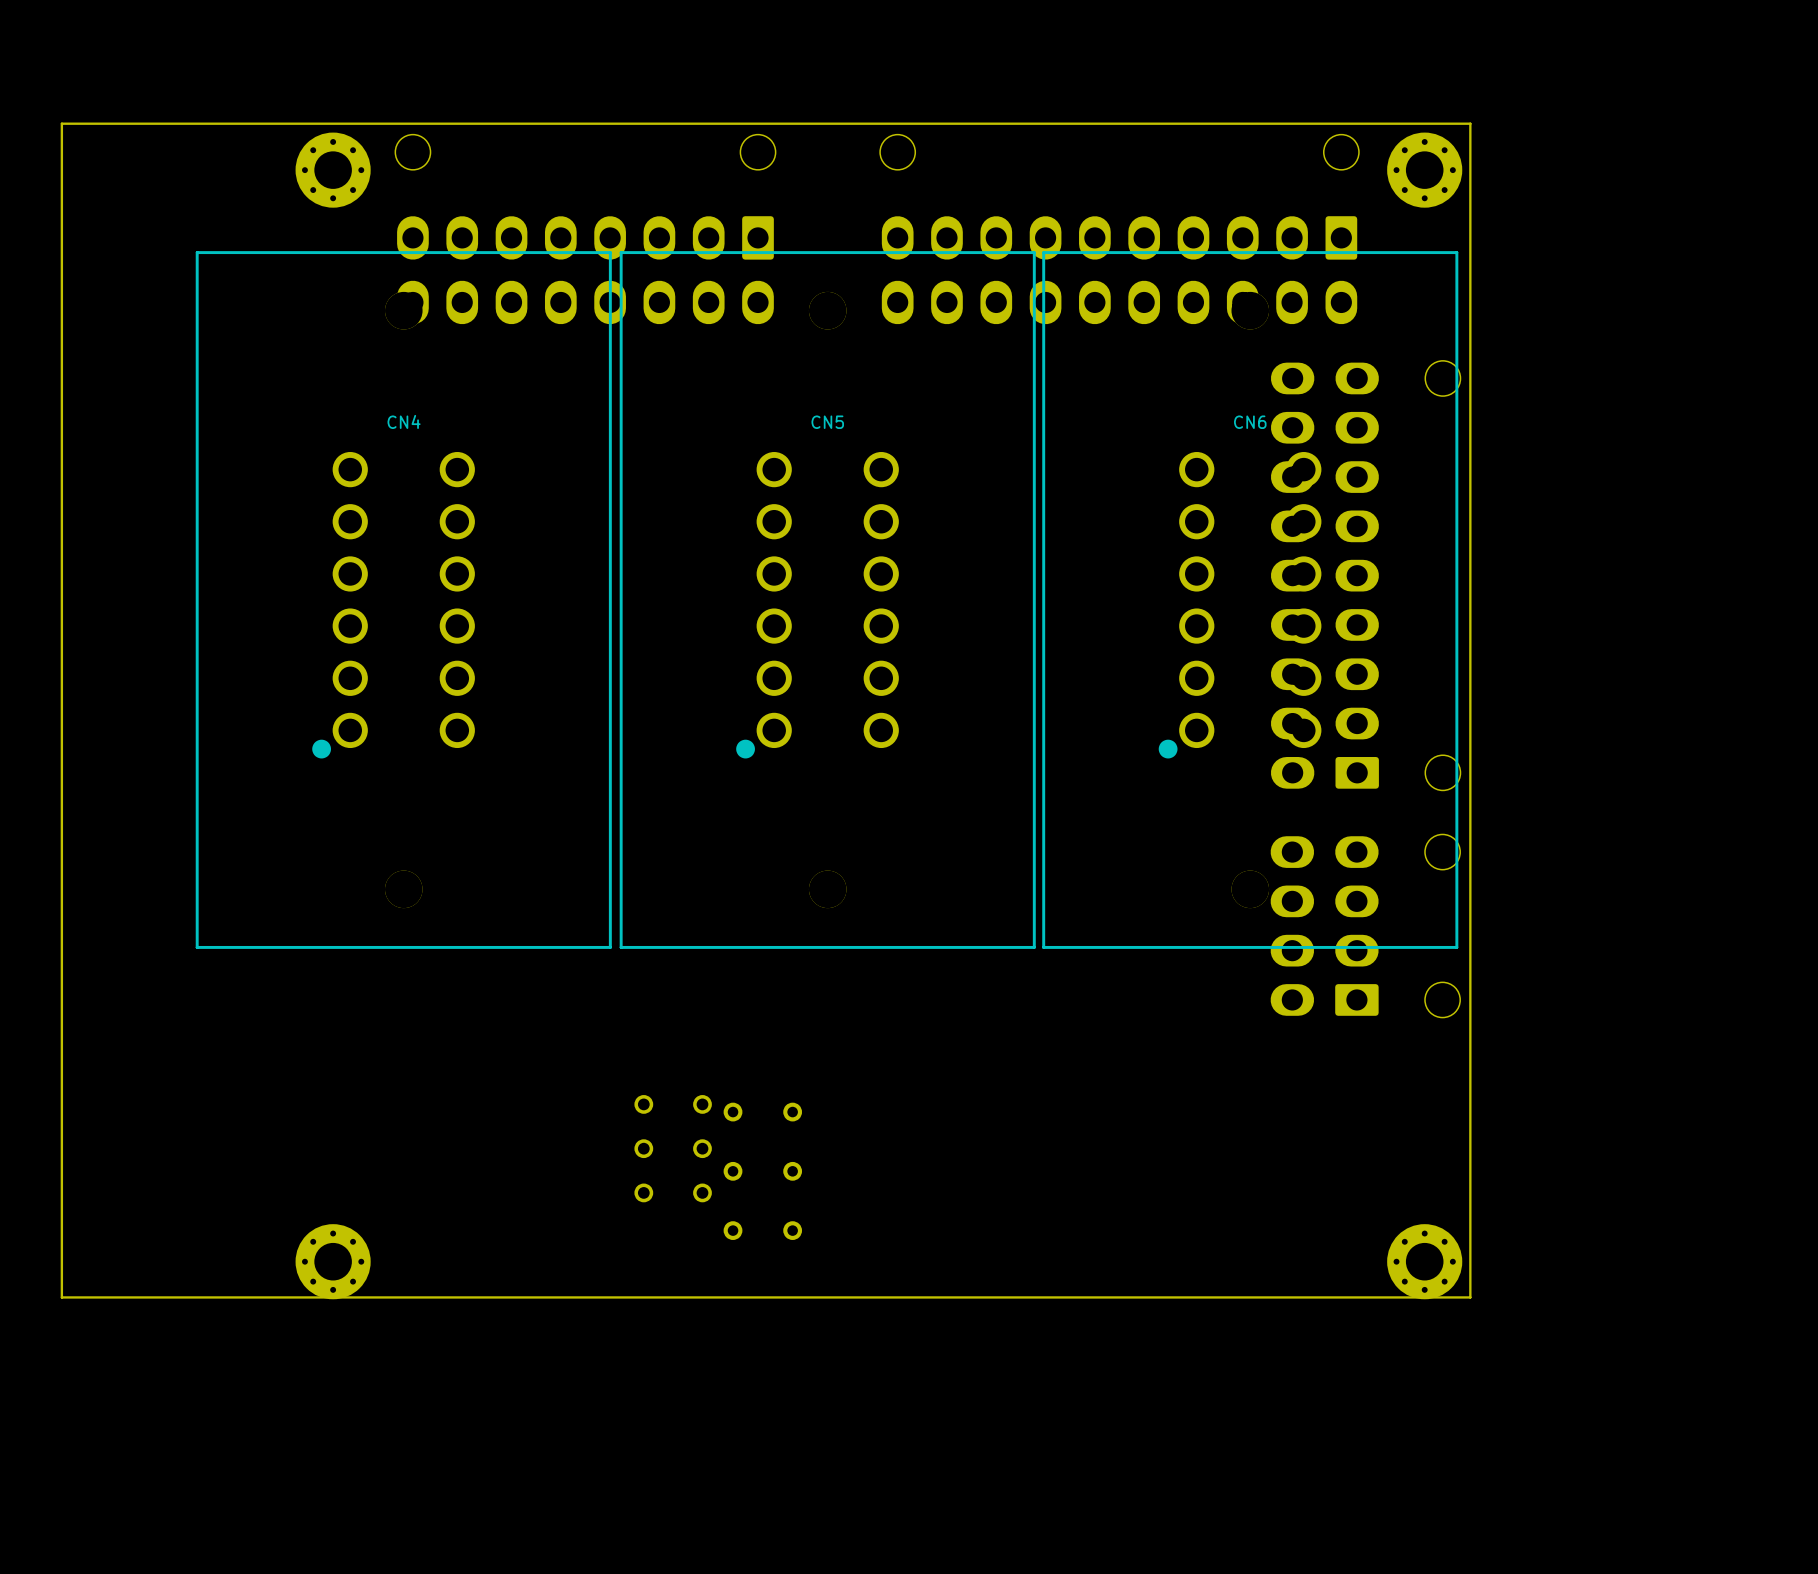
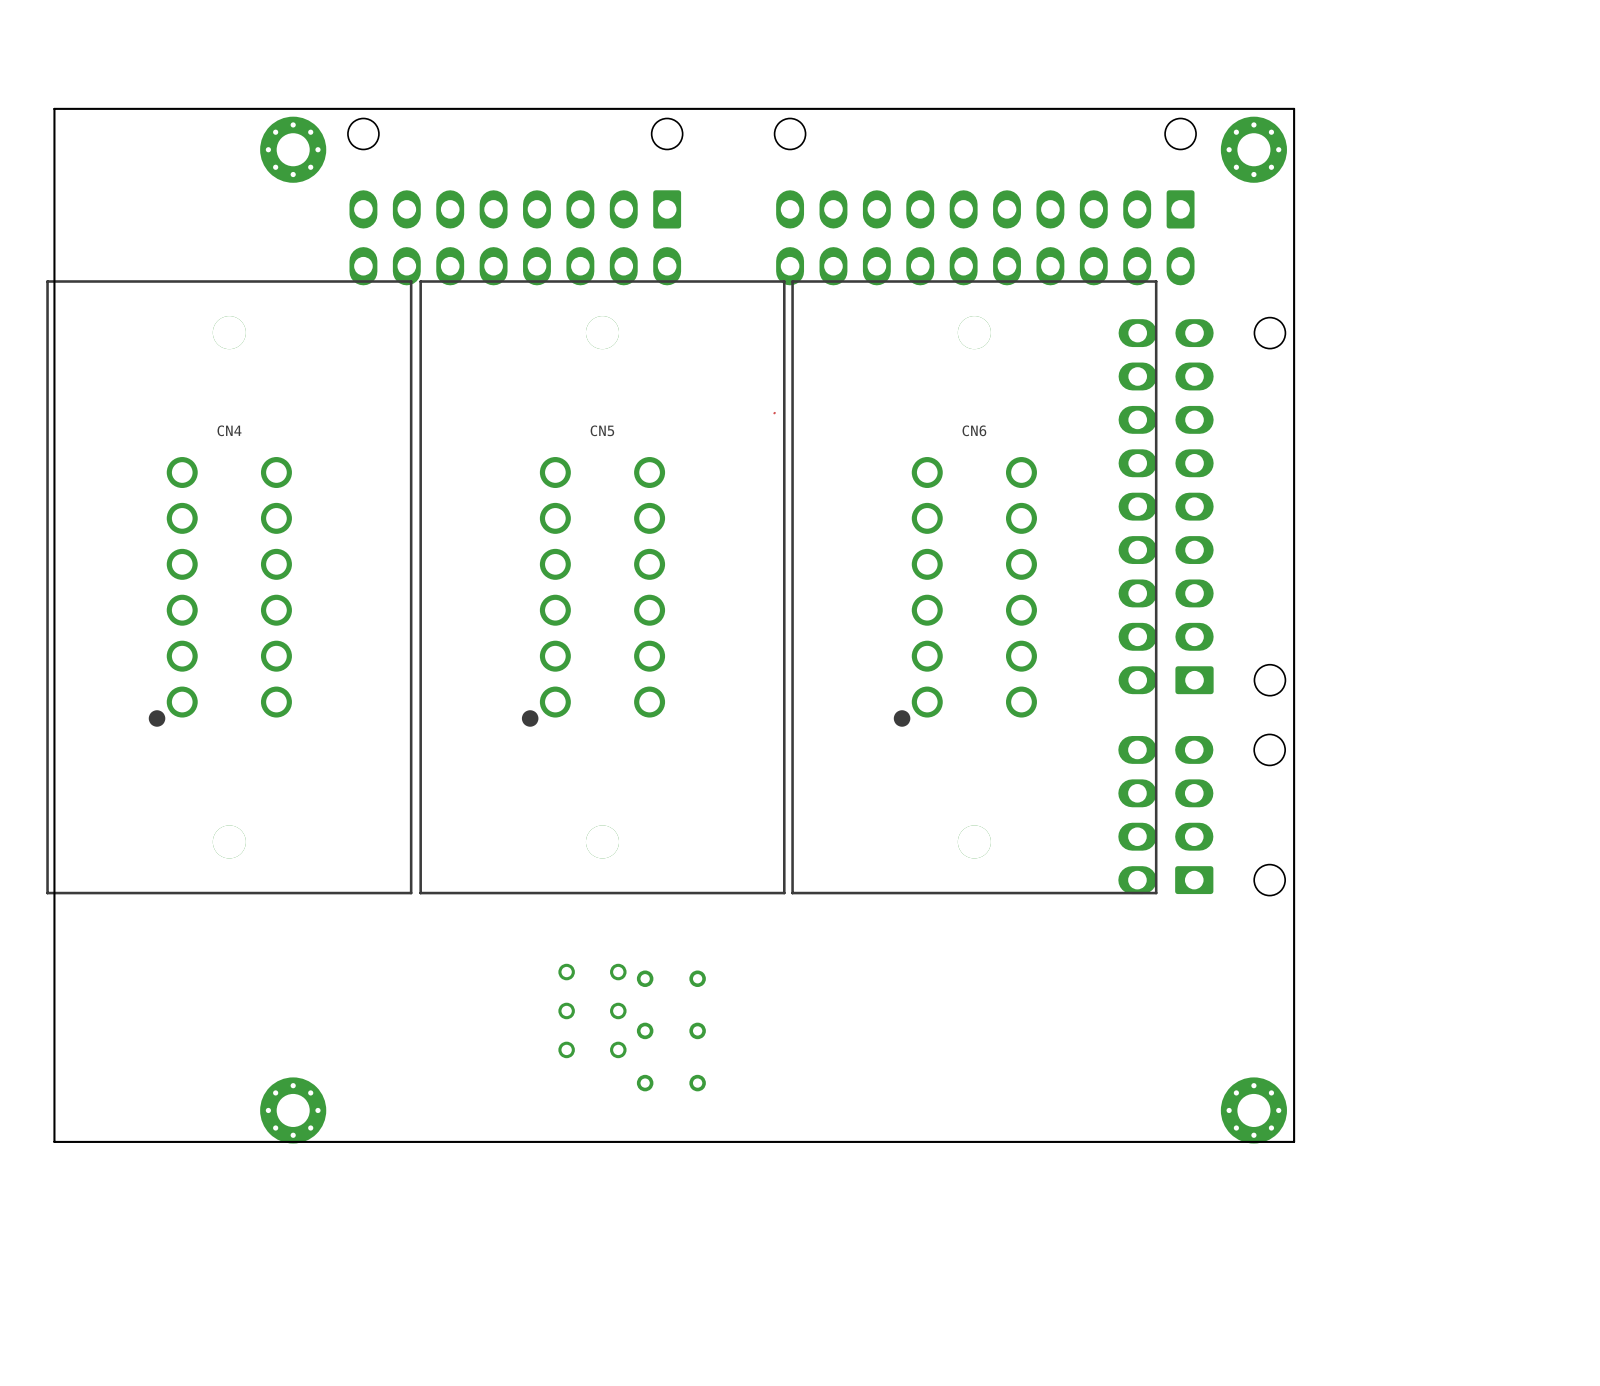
CN4 position: (403, 600) -> (229, 587)
CN5 position: (827, 600) -> (602, 587)
CN6 position: (1250, 600) -> (974, 587)

